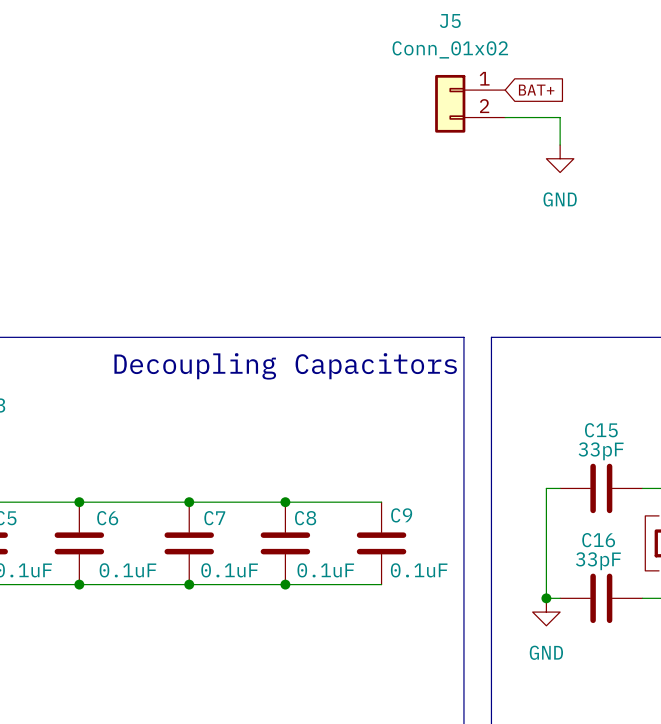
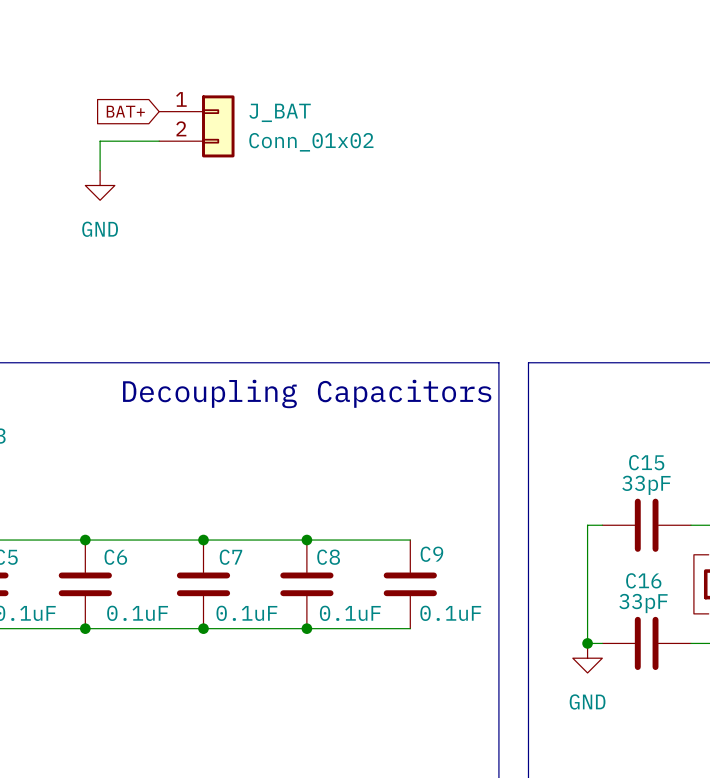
global label: BAT+ (536, 90) -> none
global label: none -> BAT+ (125, 111)
J5: Conn_01x02 (470, 103) -> none
J_BAT: none -> Conn_01x02 (196, 126)
wire: (505, 117) (560, 117) (560, 145) -> none
wire: none -> (159, 141) (100, 141) (100, 170)
power symbol: GND (560, 158) -> none
power symbol: none -> GND (100, 185)

